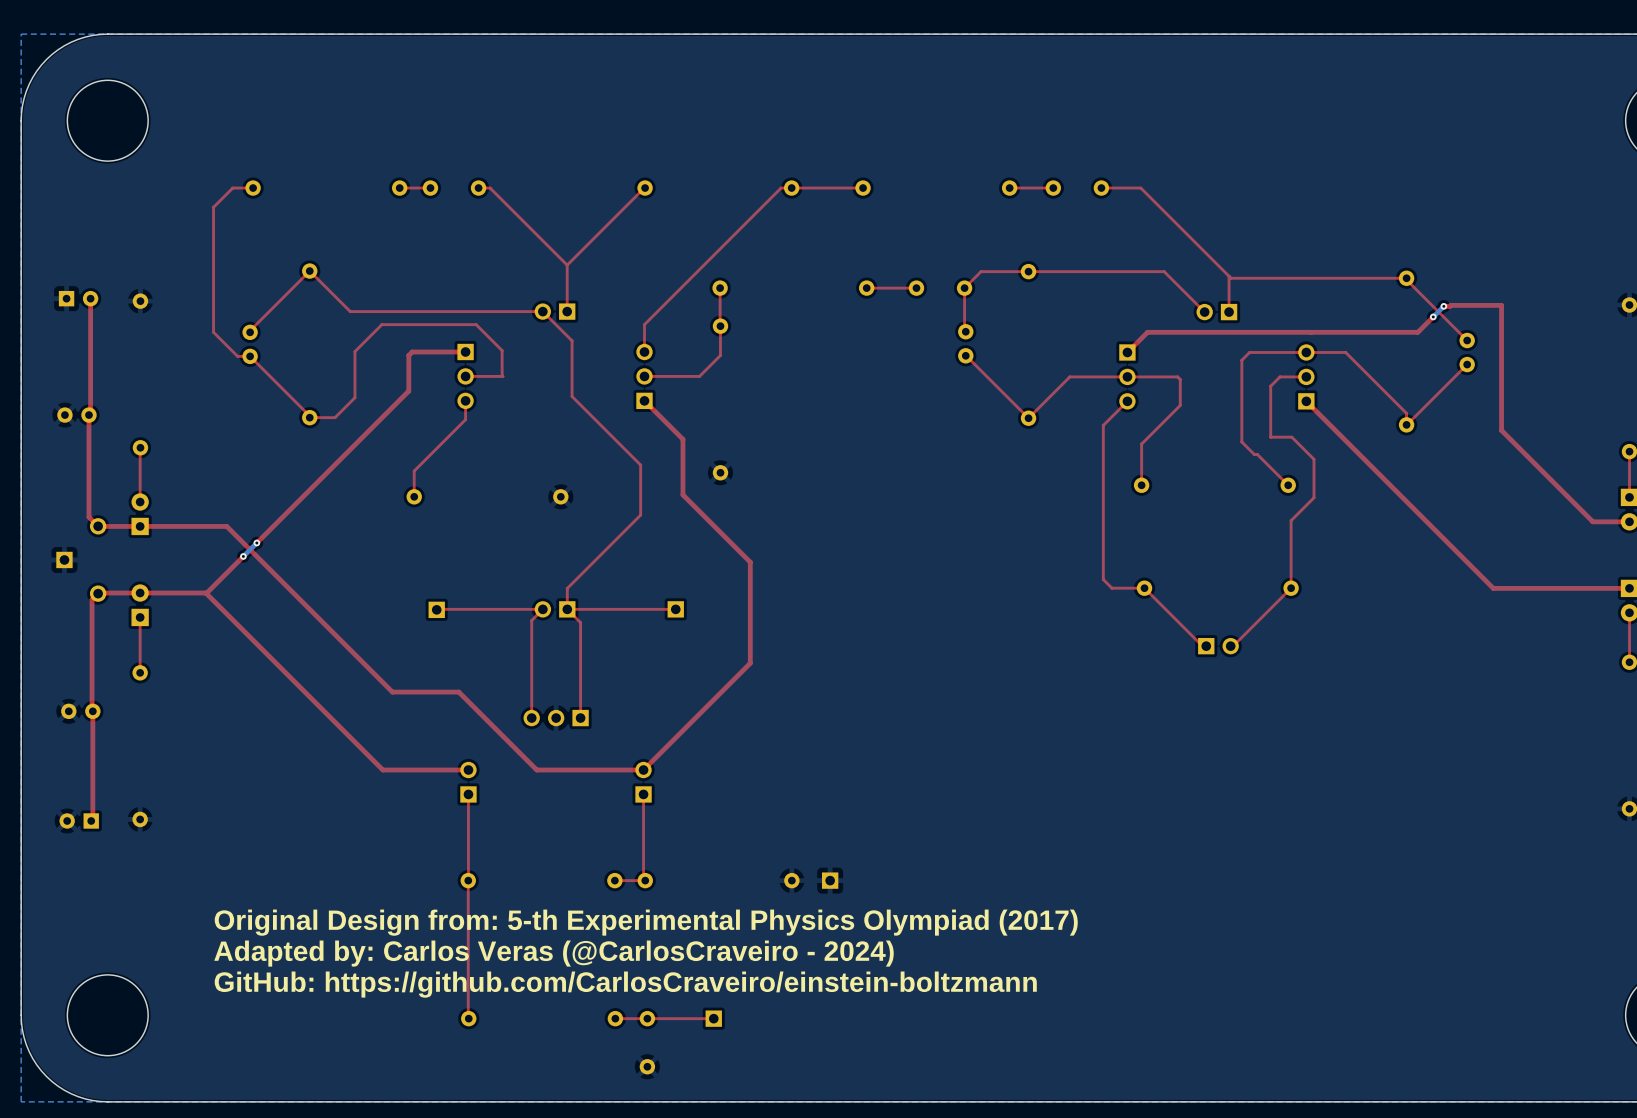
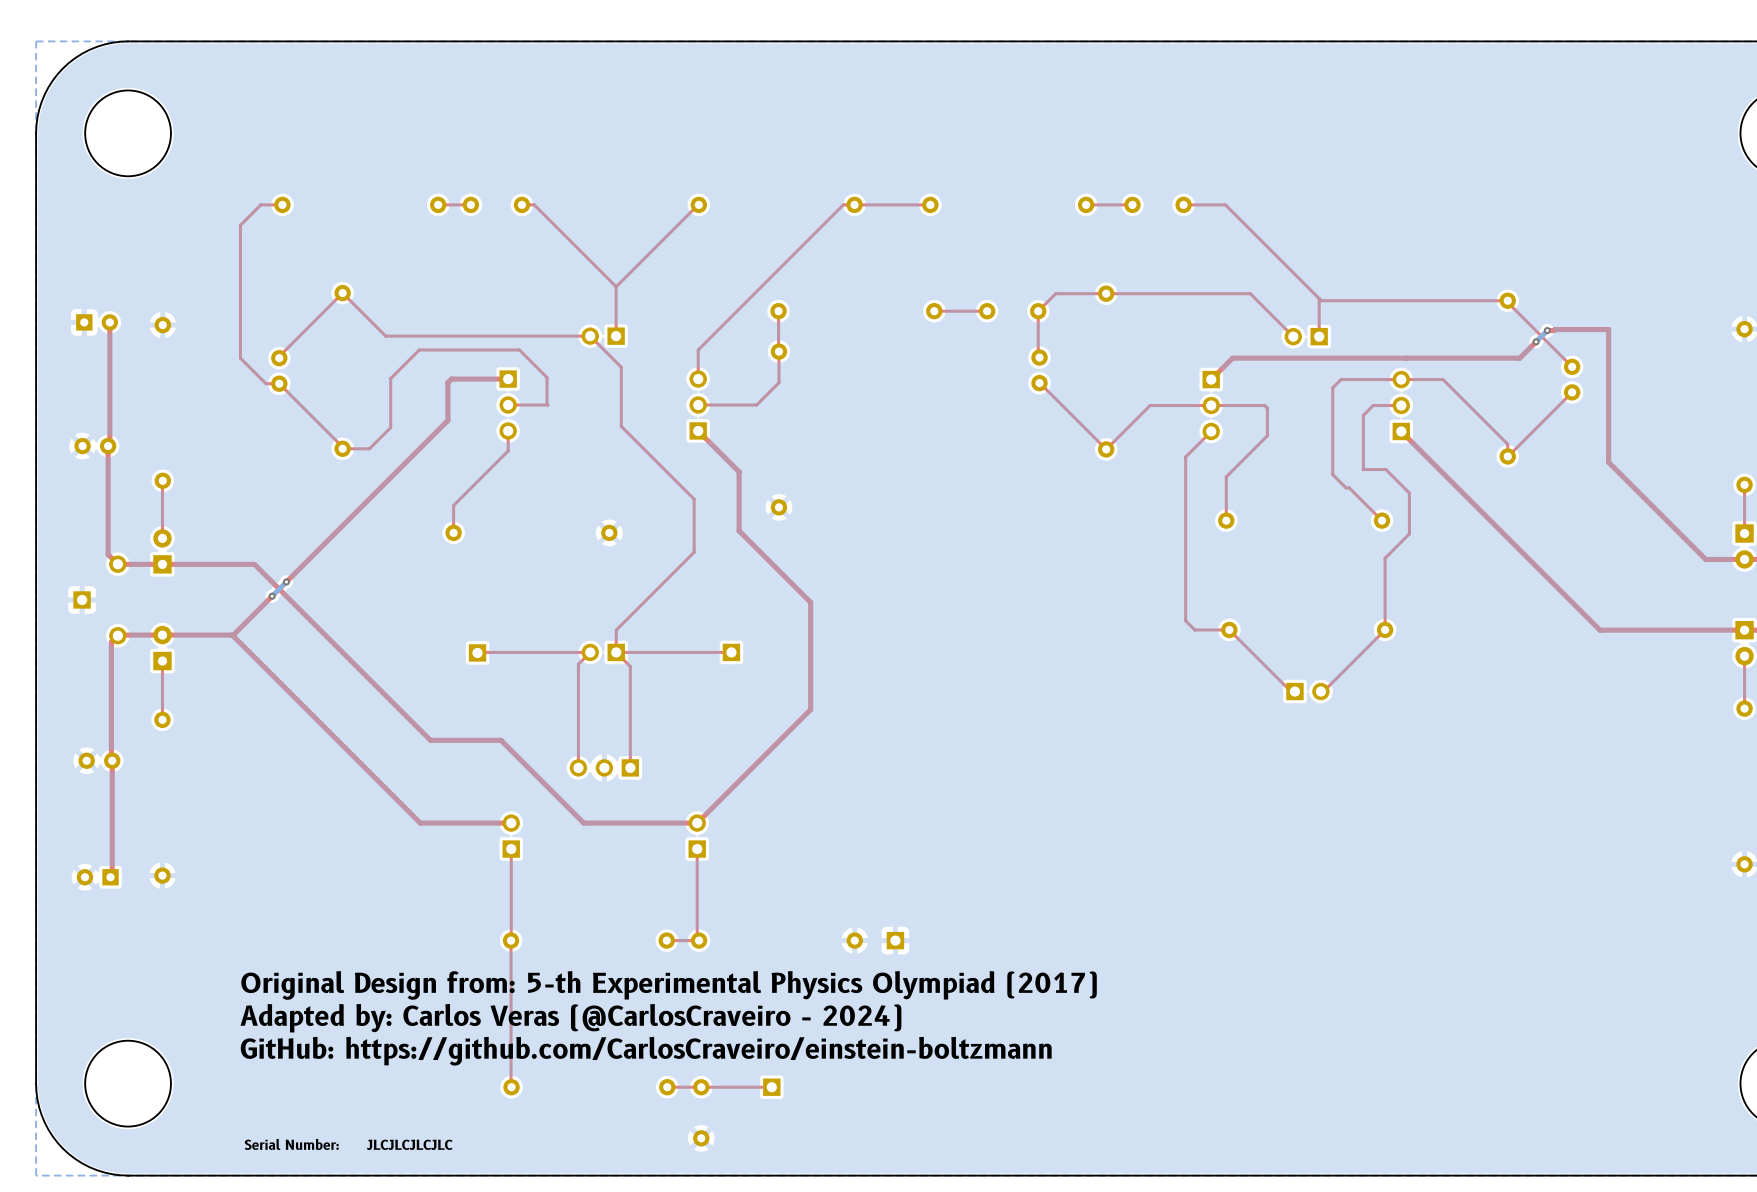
text: none -> Serial Number: (291, 1144)
text: none -> JLCJLCJLCJLC (409, 1144)

